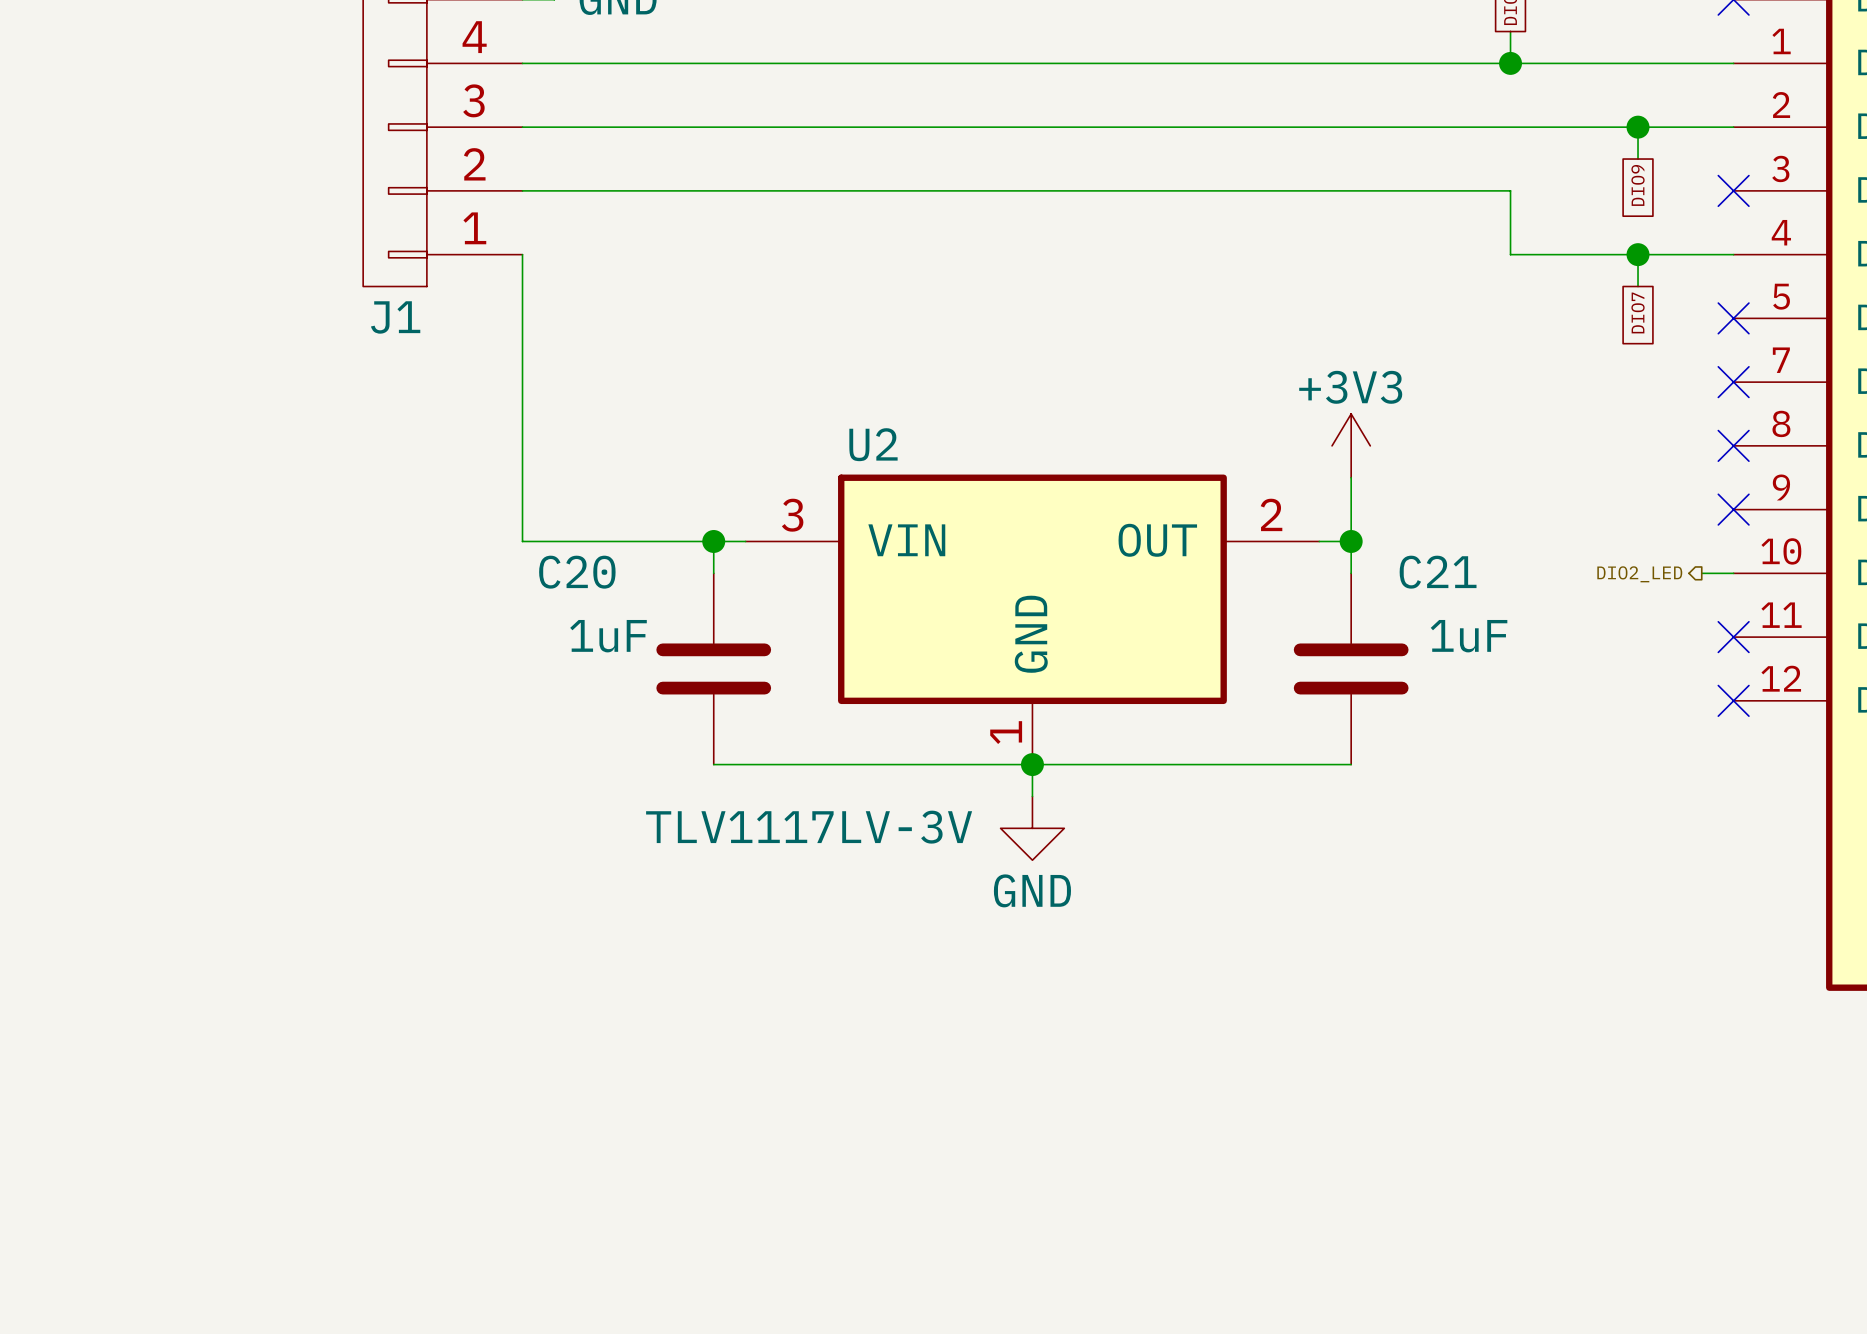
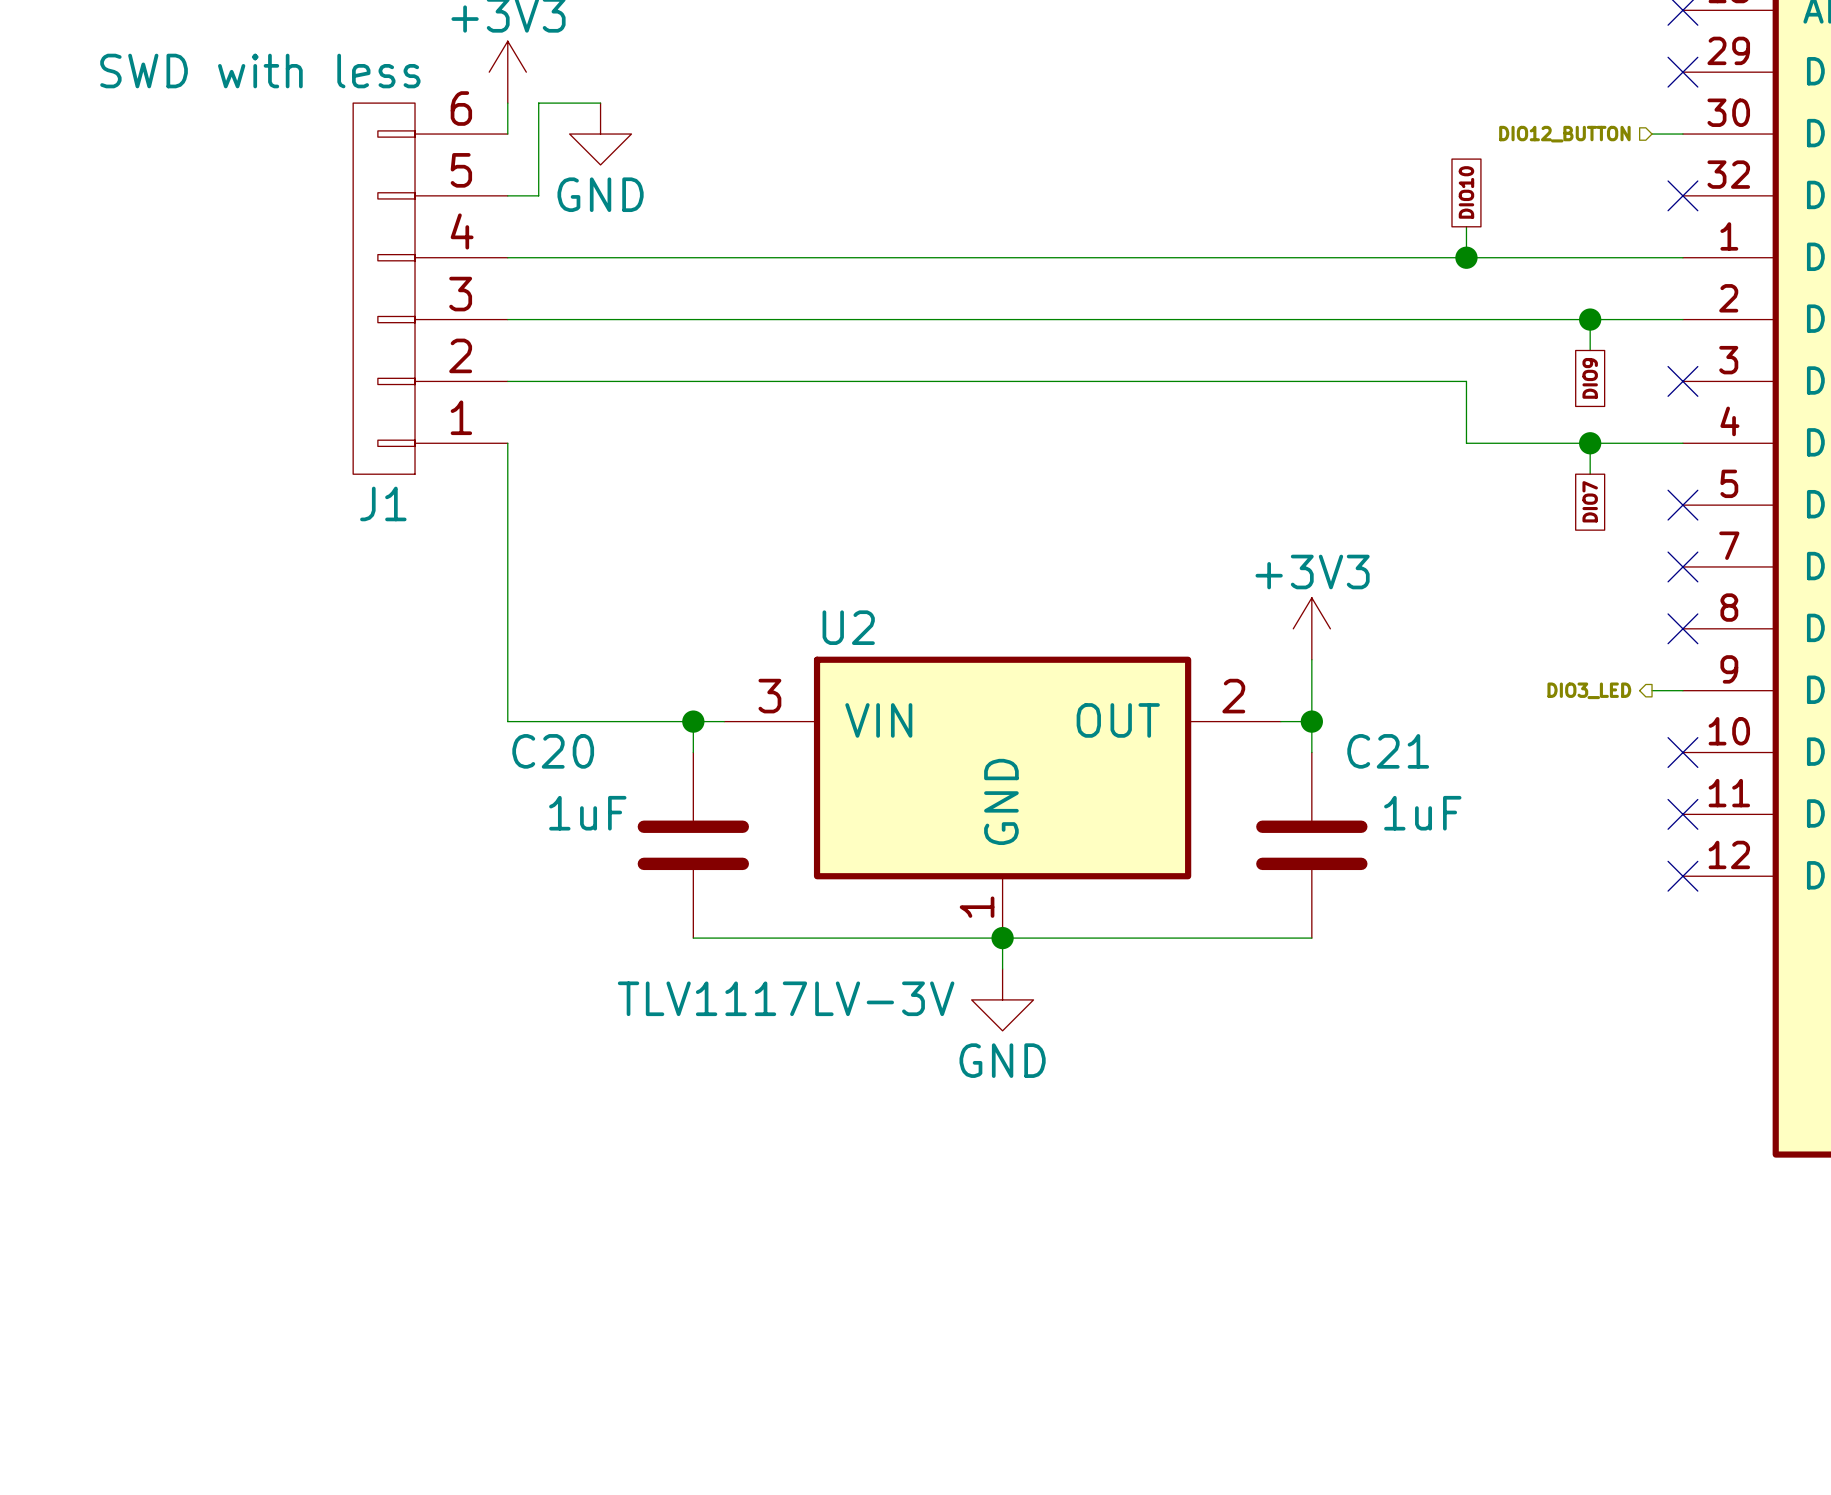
no-connect mark position: (1733, 509) -> (1682, 752)
hierarchical label: none -> DIO3_LED (1589, 690)
wire: (1701, 573) (1733, 573) -> (1652, 690) (1682, 690)
hierarchical label: DIO2_LED (1639, 574) -> none

